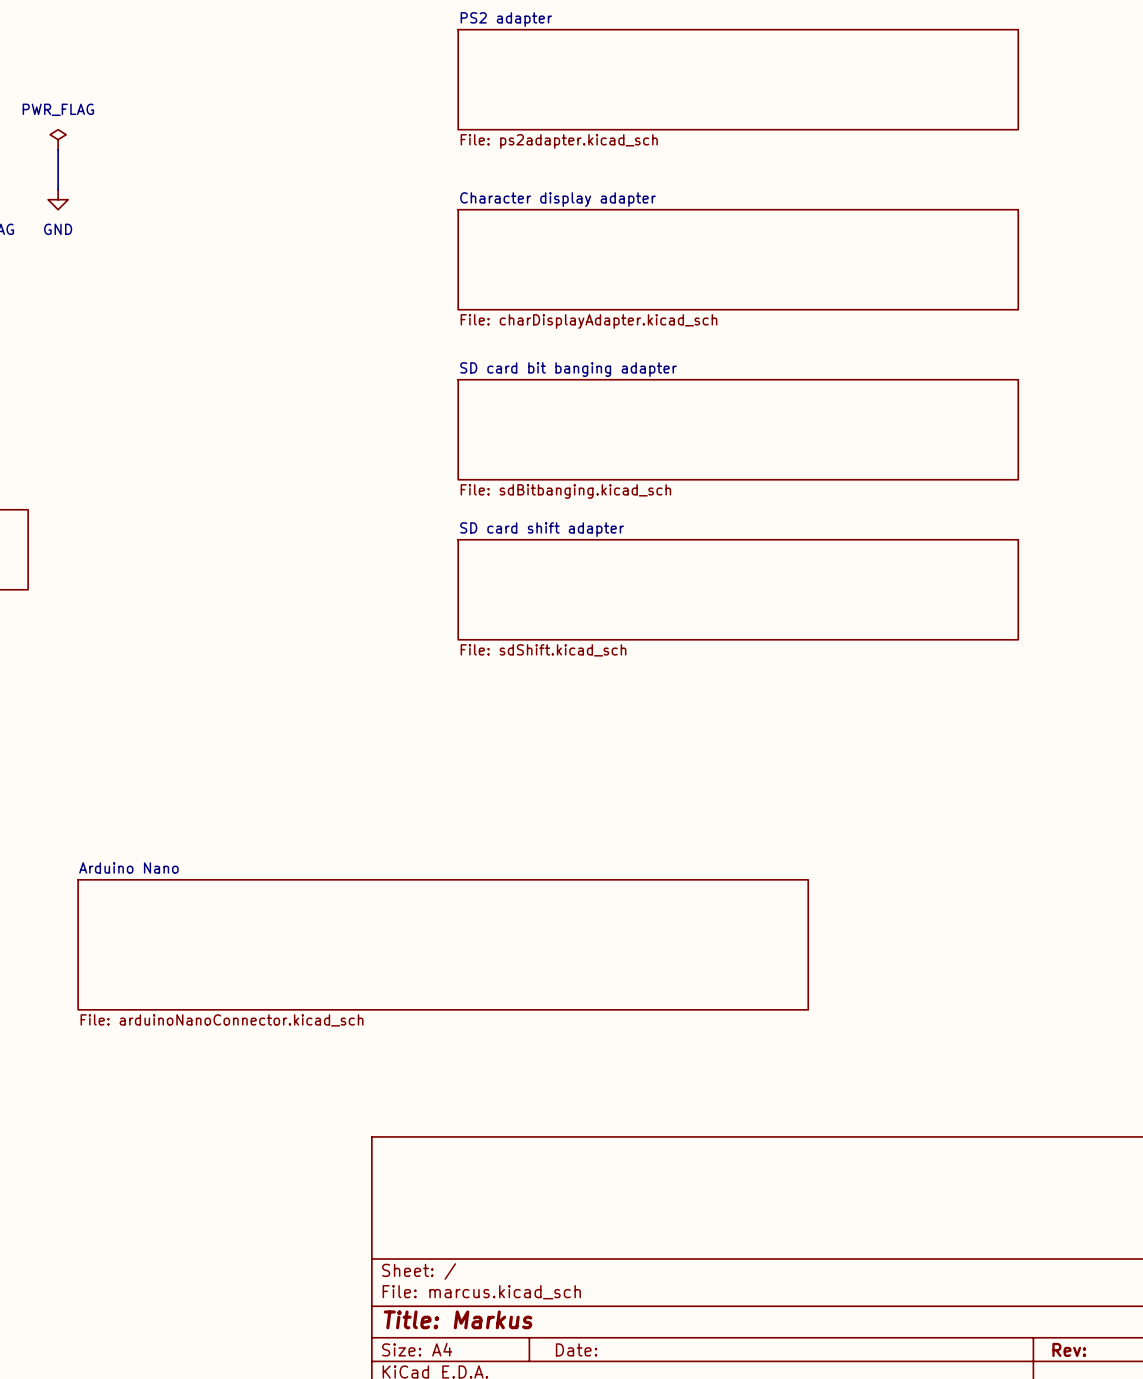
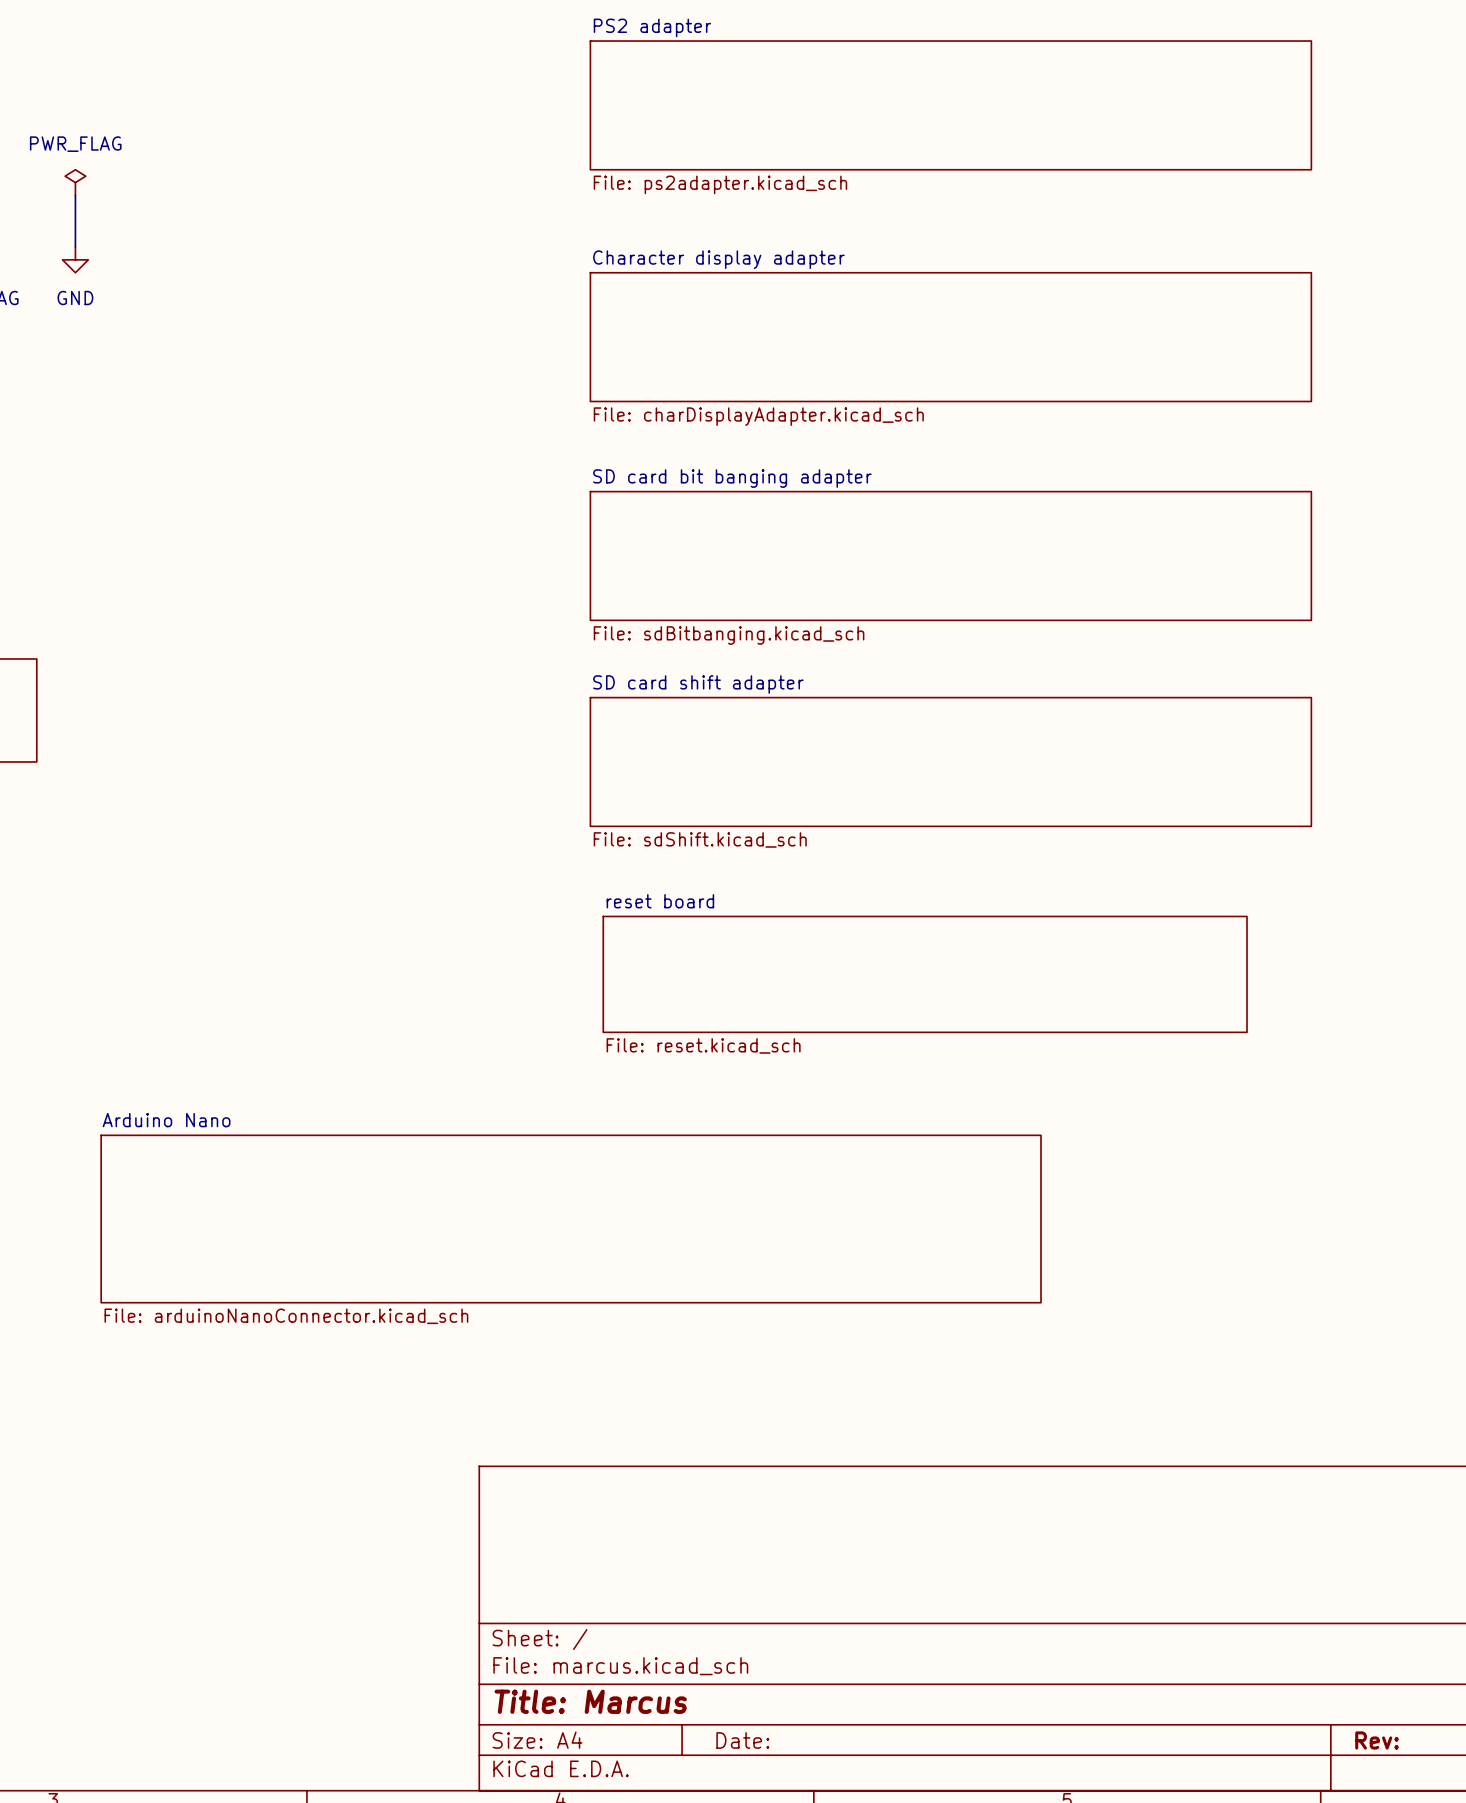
sheet reset board: none -> File: reset.kicad_sch (925, 974)
title block: Title: Markus (458, 1319) -> Title: Marcus (590, 1701)

